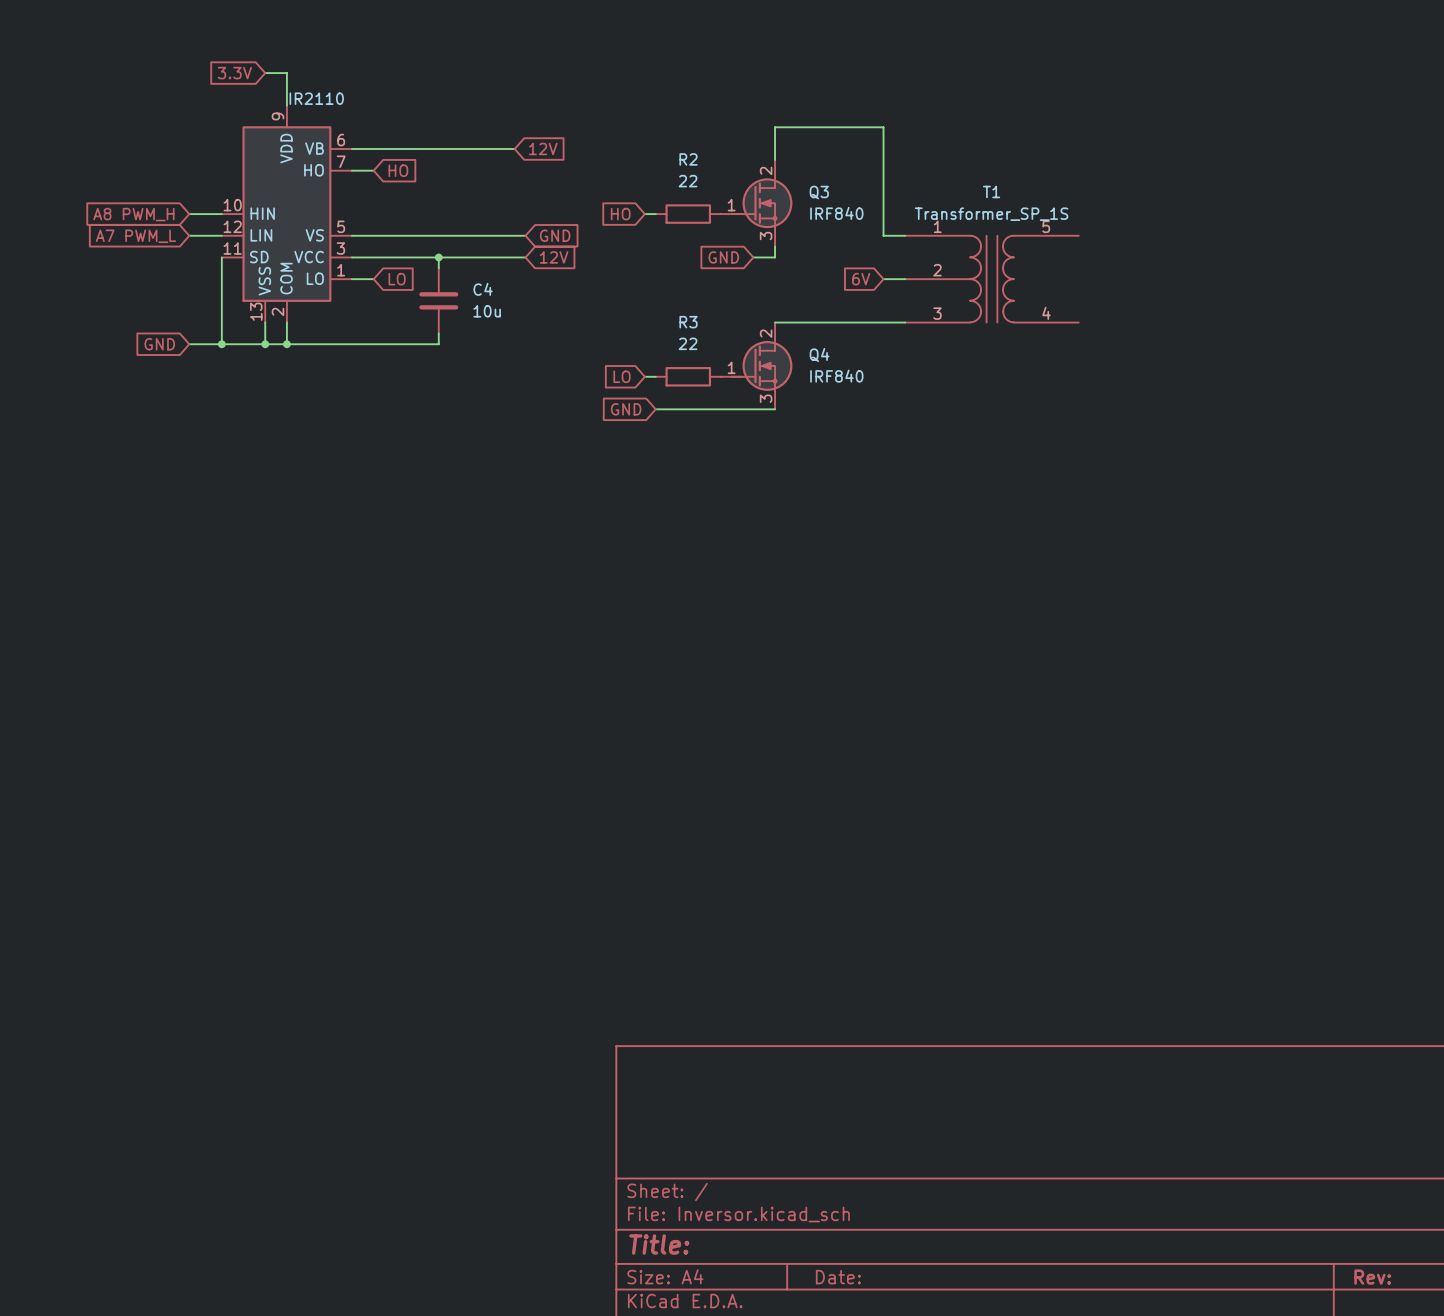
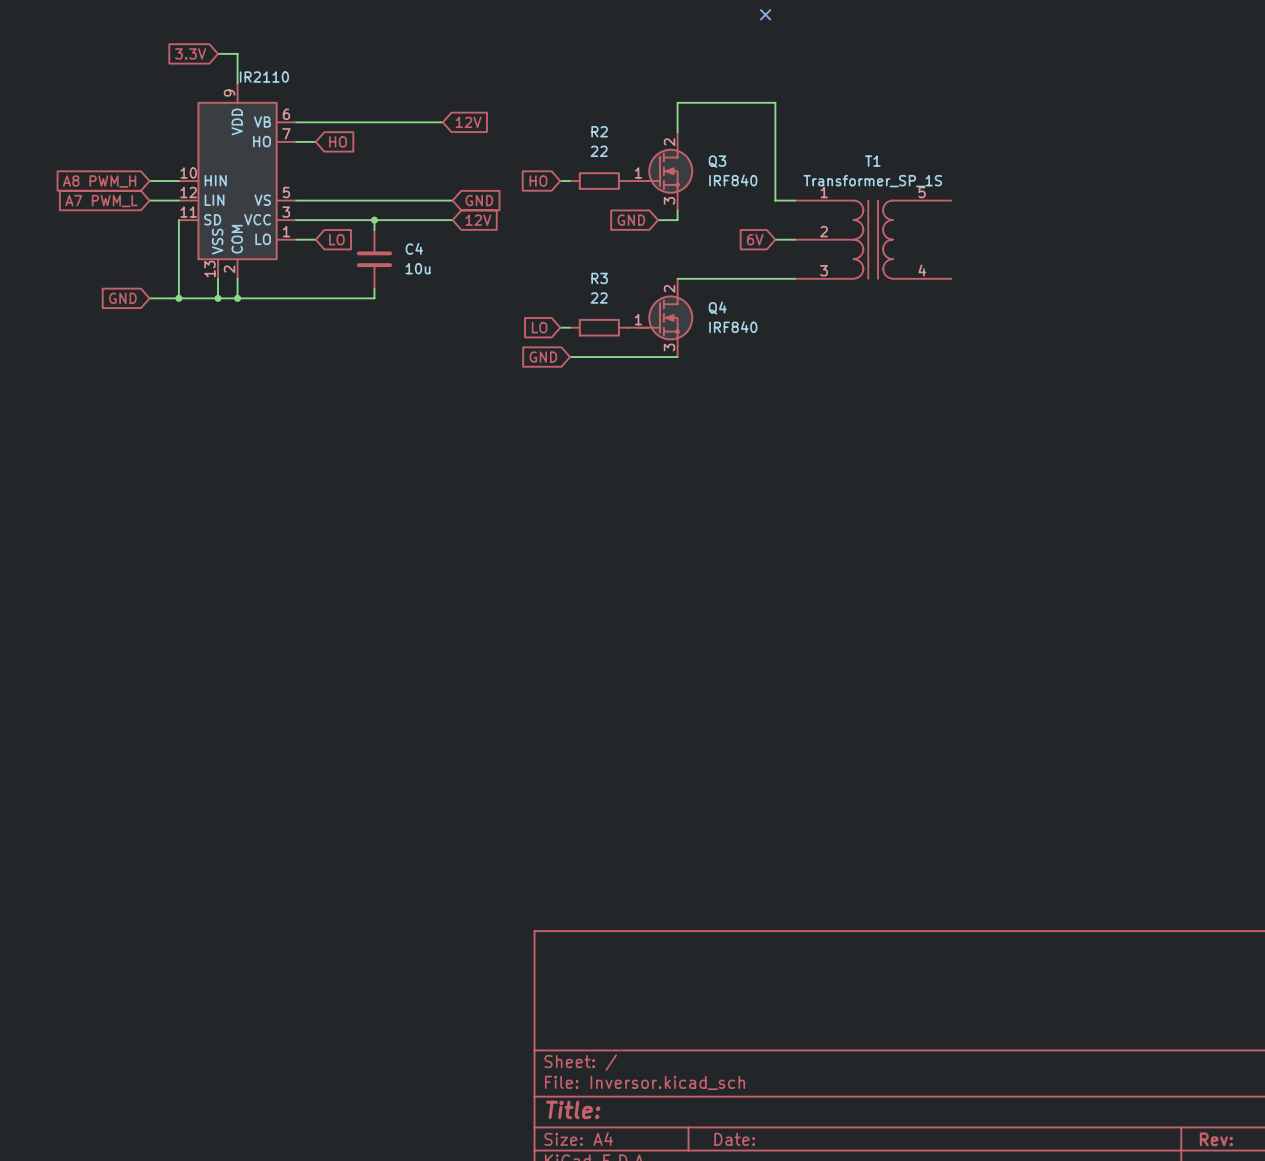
no-connect mark: none -> (765, 14)

